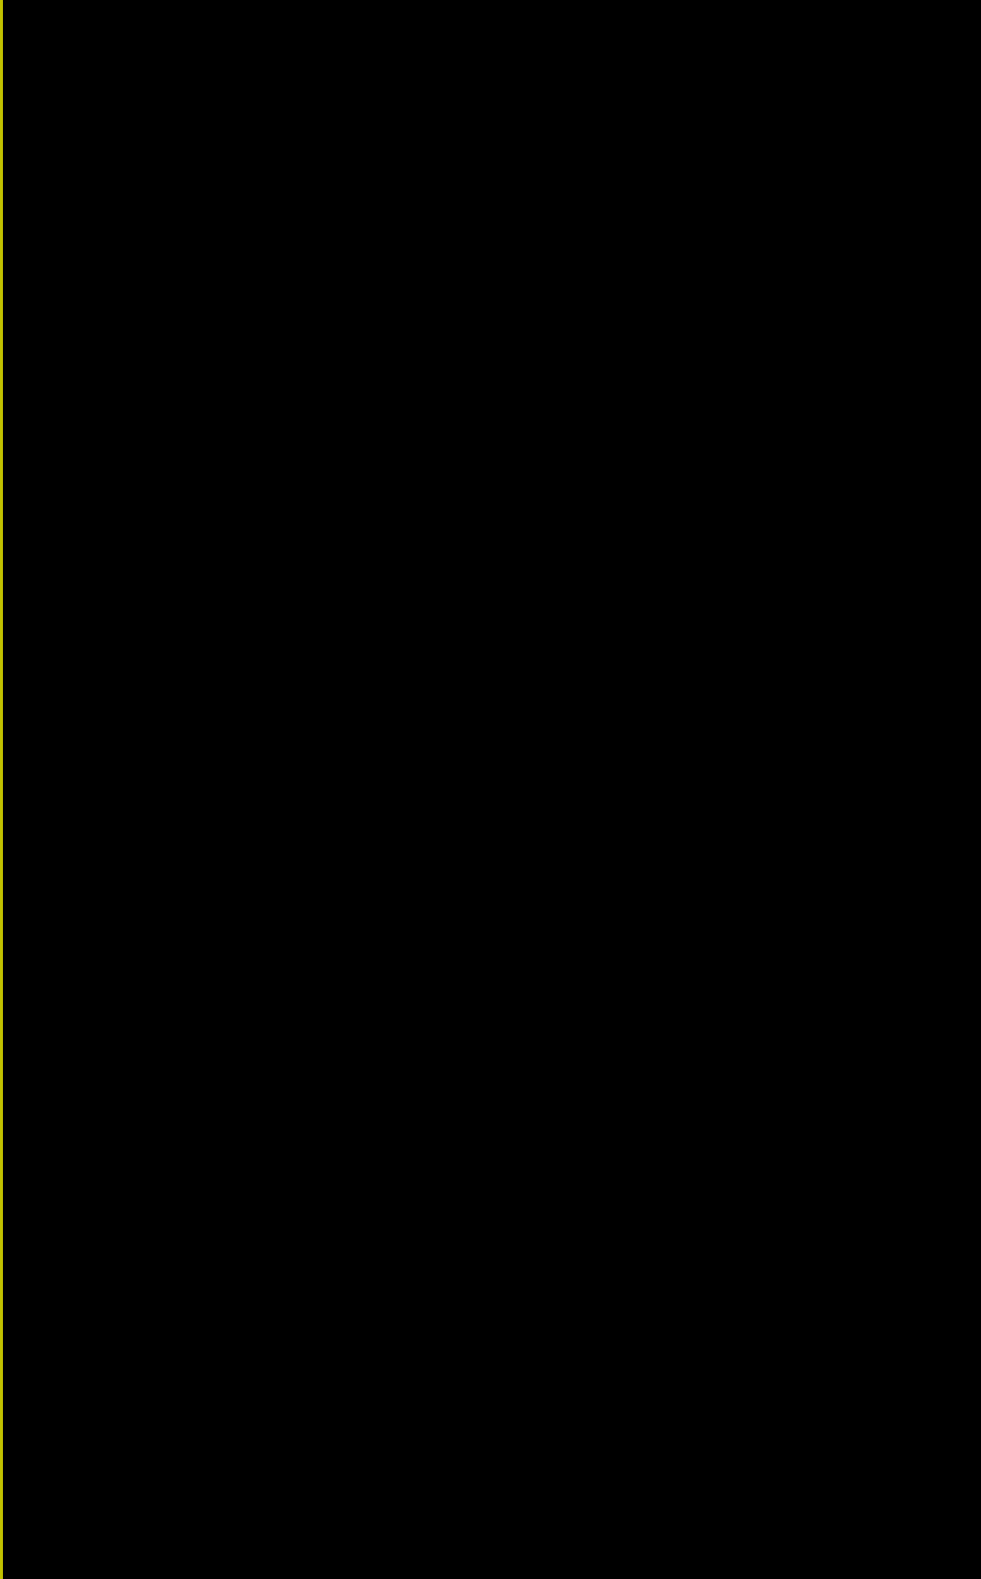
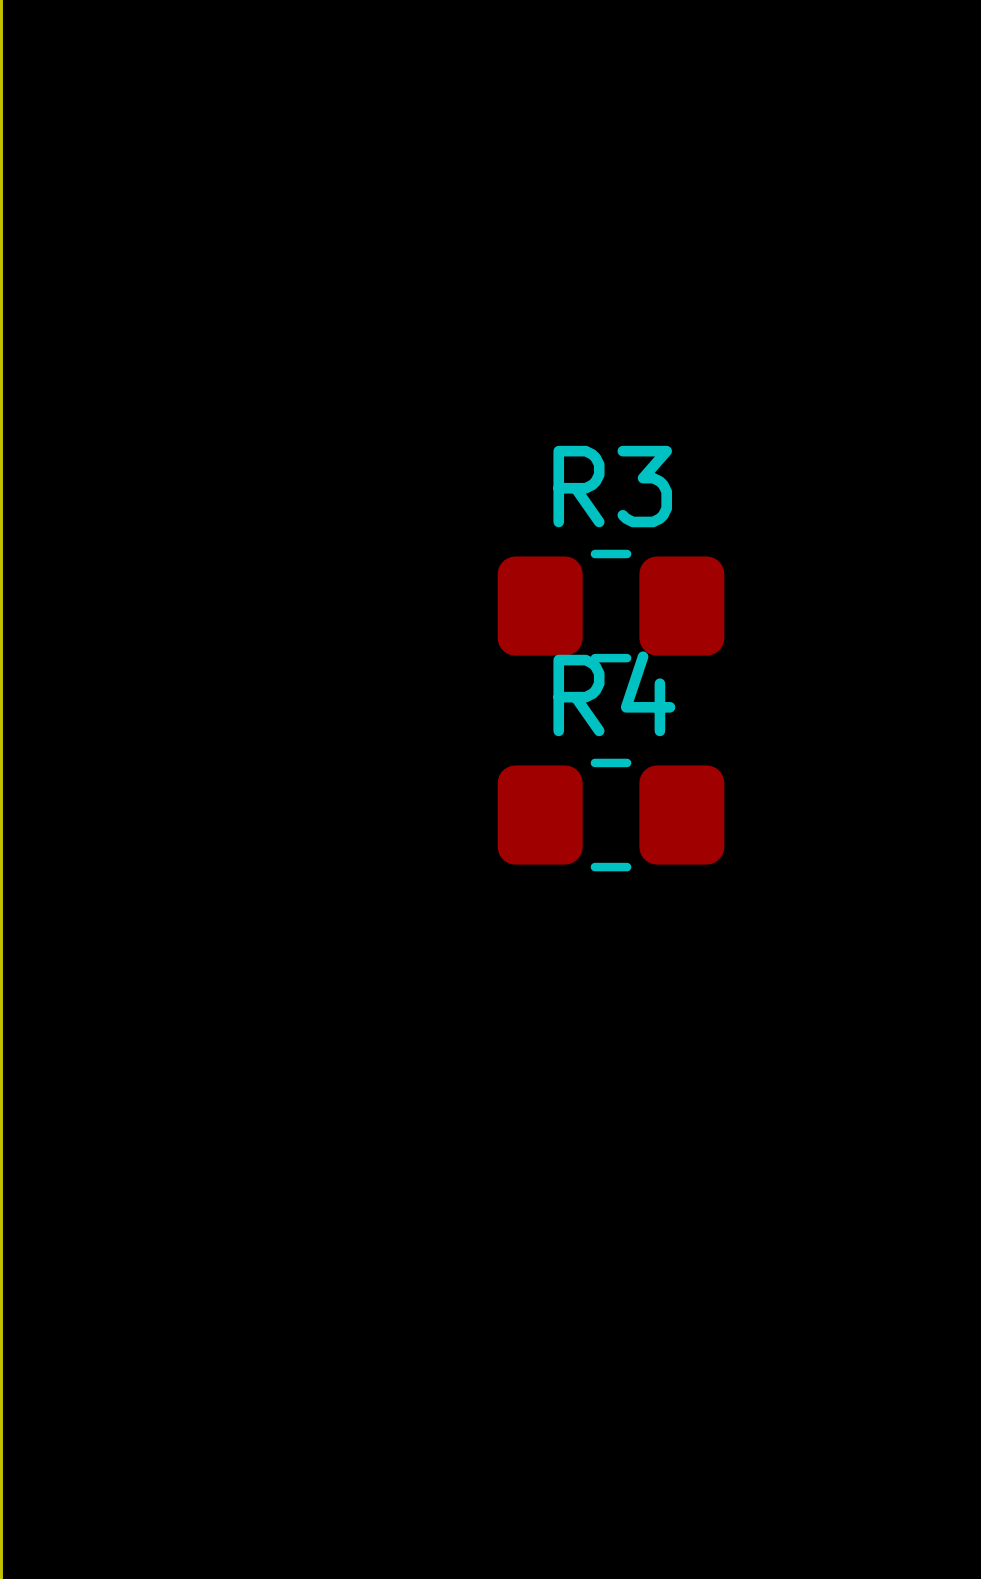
R3: none -> (611, 606)
R4: none -> (611, 815)

